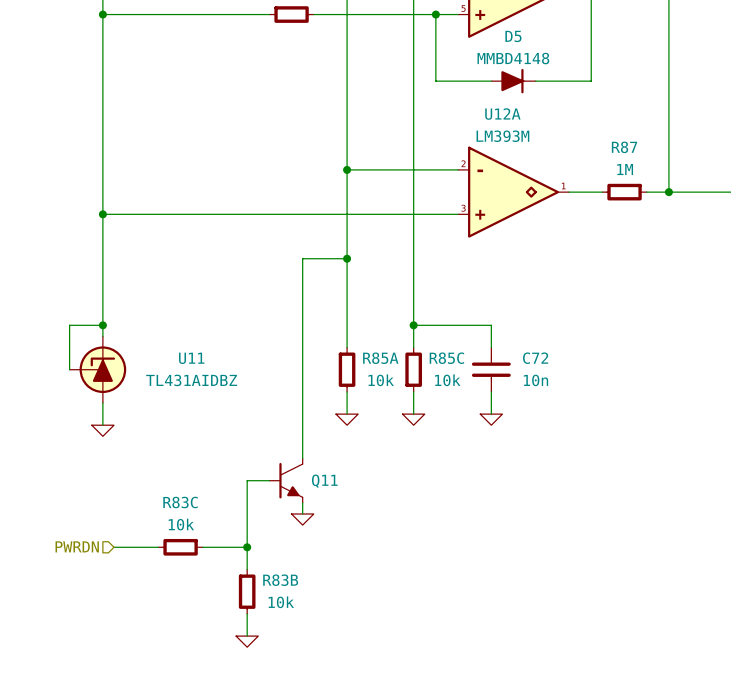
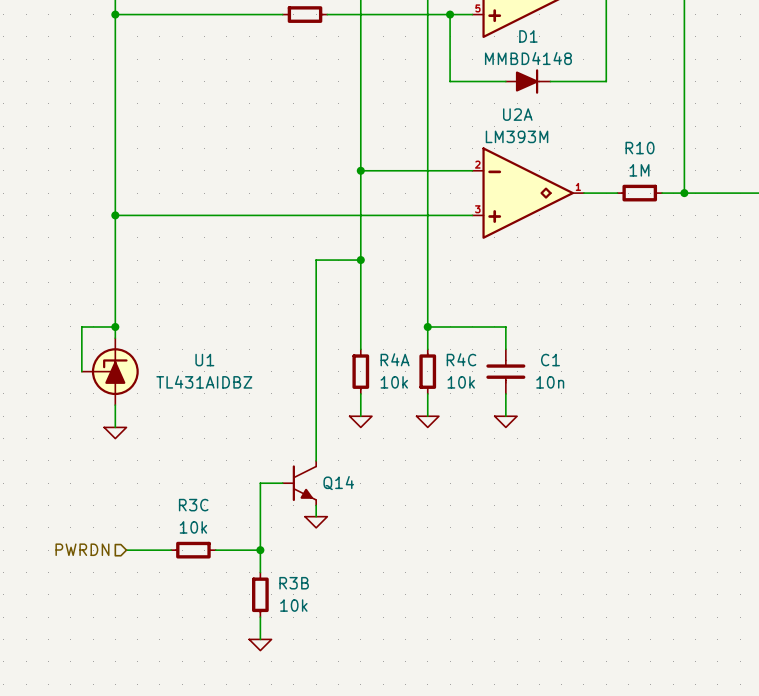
D5 name: D5 (513, 36) -> D1 (528, 36)
U12A name: U12A (502, 114) -> U2A (517, 114)
R87 name: R87 (624, 147) -> R10 (640, 148)
U11 name: U11 (191, 358) -> U1 (204, 360)
R85A name: R85A (380, 358) -> R4A (395, 359)
R85C name: R85C (446, 358) -> R4C (461, 359)
C72 name: C72 (535, 358) -> C1 (550, 360)
Q11 name: Q11 (324, 481) -> Q14 (338, 483)
R83C name: R83C (180, 502) -> R3C (193, 505)
R83B name: R83B (280, 580) -> R3B (294, 583)

